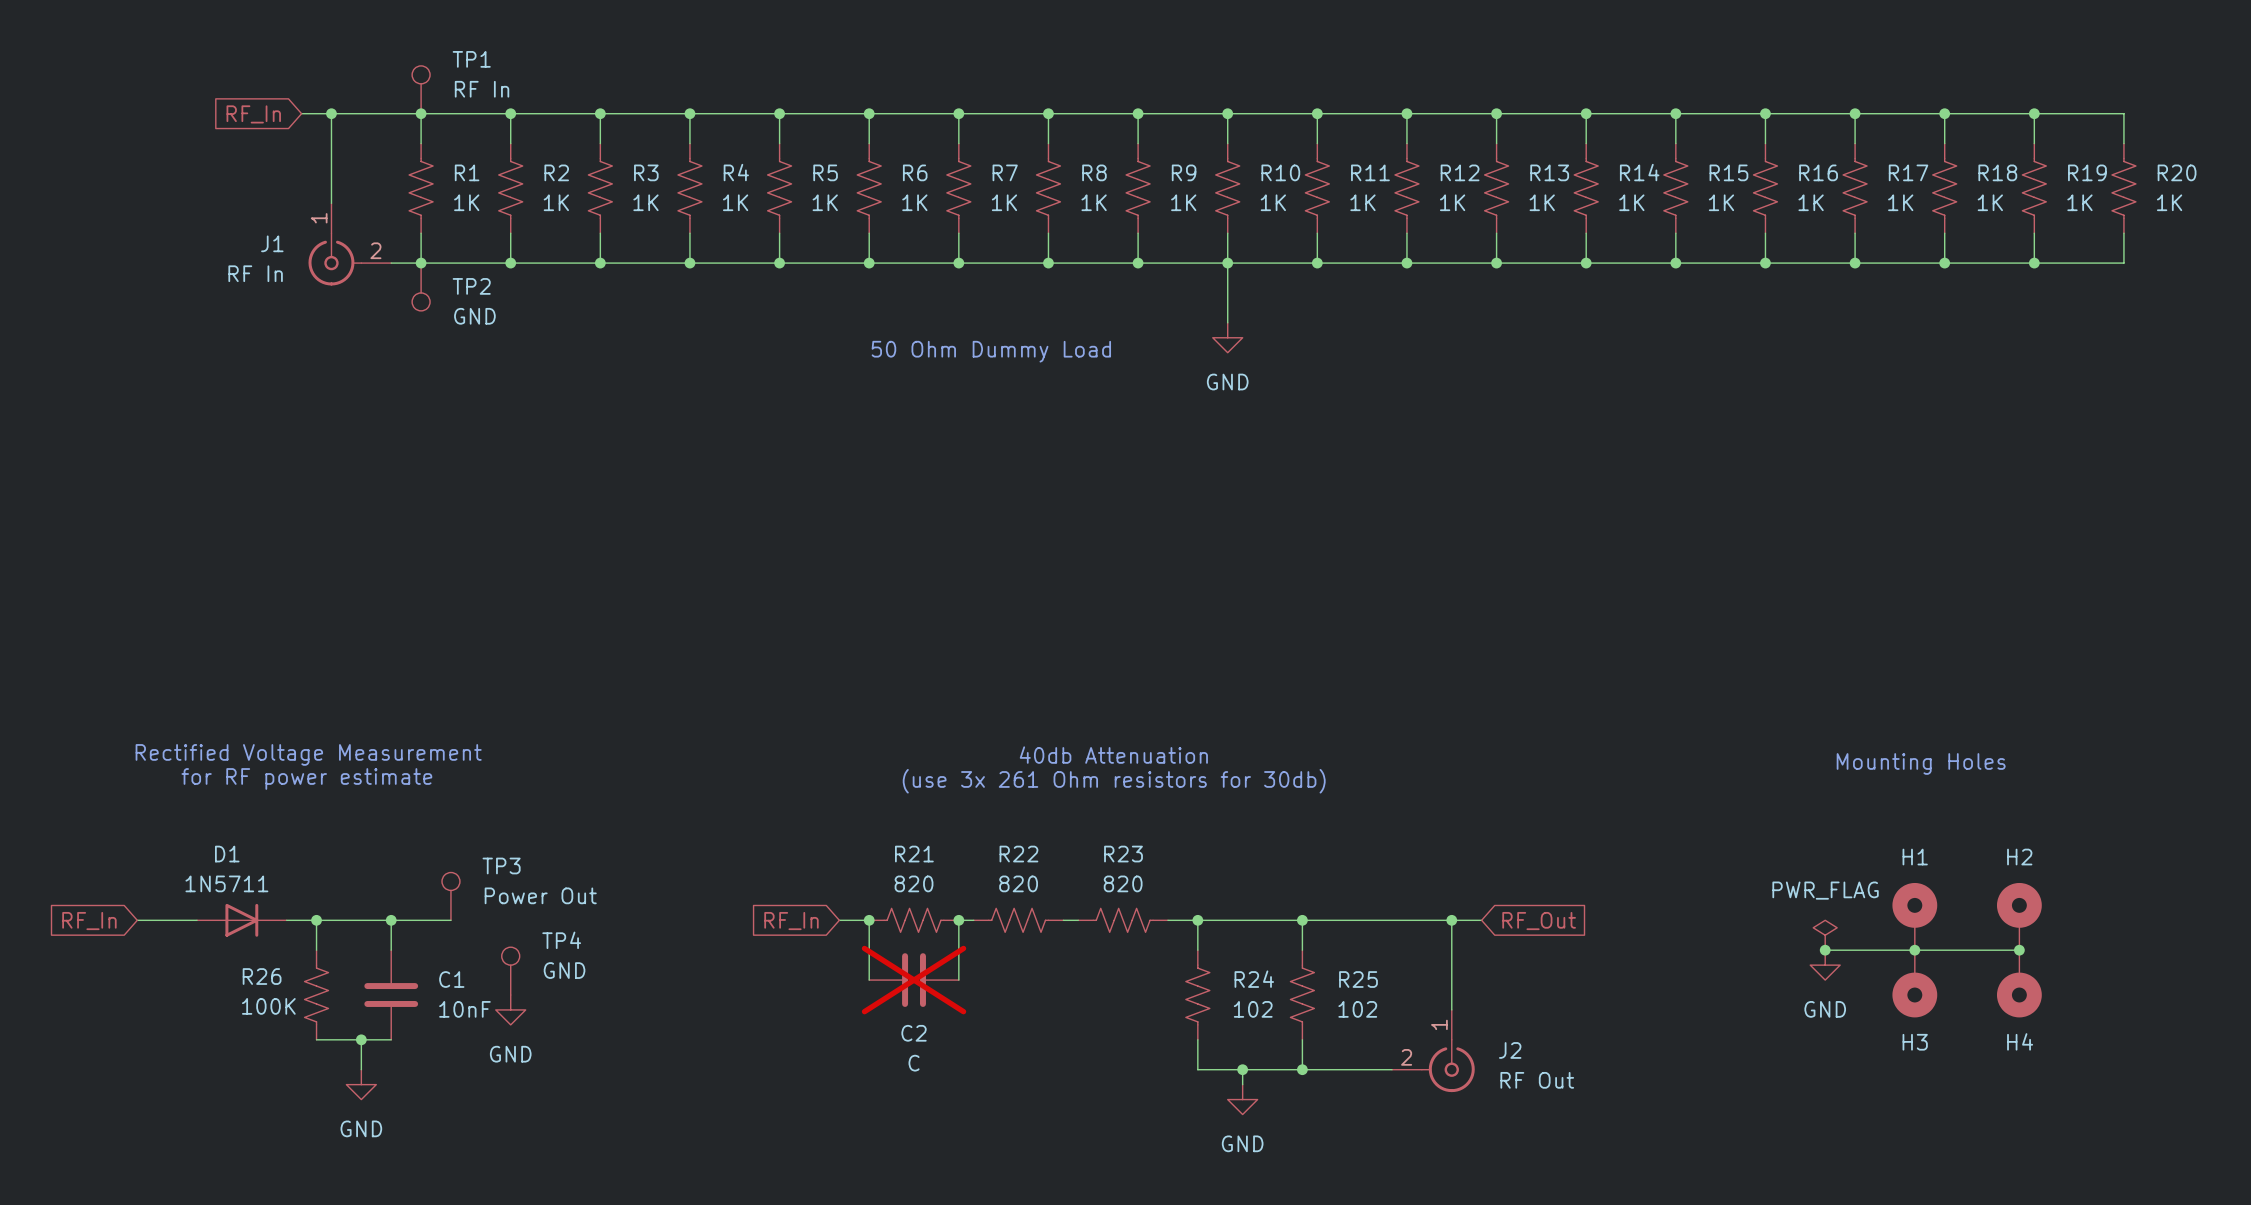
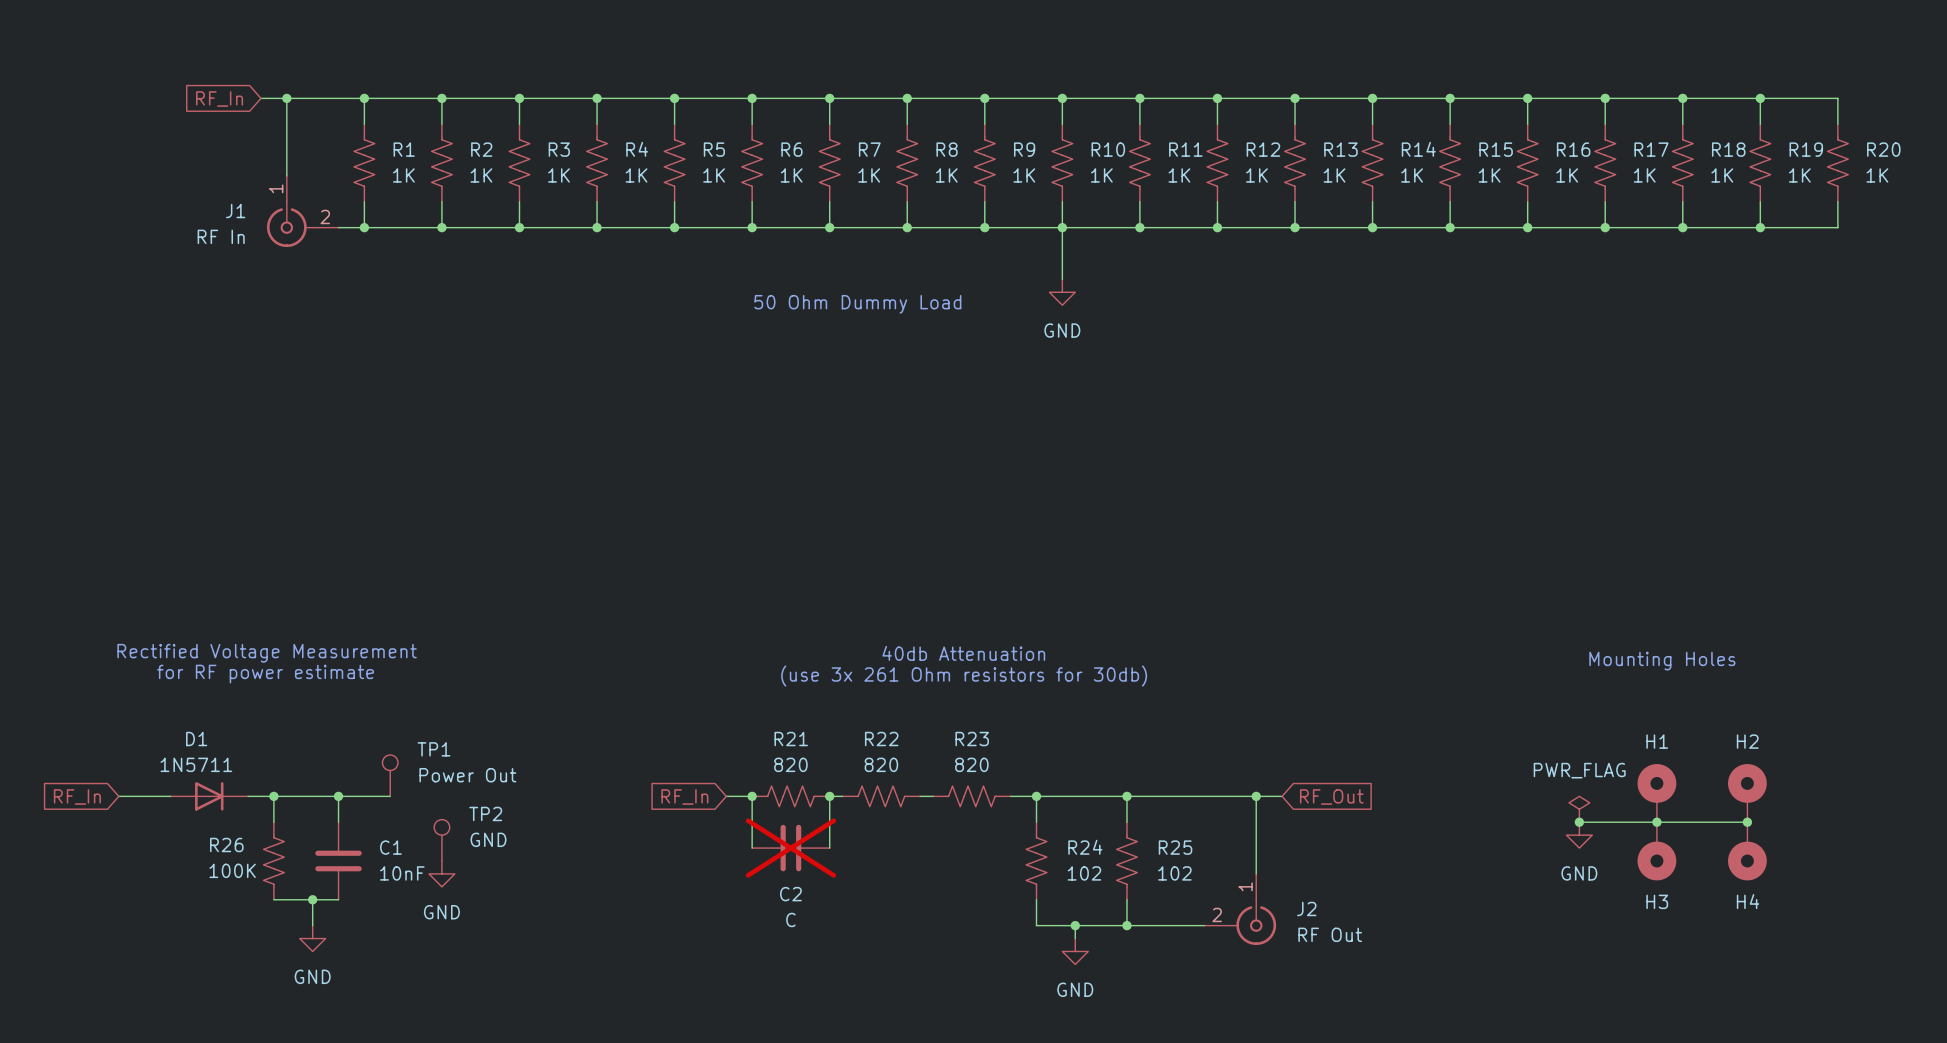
TP1: RF In (421, 89) -> none
TP2: GND (421, 286) -> none
TP3 name: TP3 (501, 865) -> TP1 (434, 749)
TP4 name: TP4 (561, 940) -> TP2 (485, 813)

